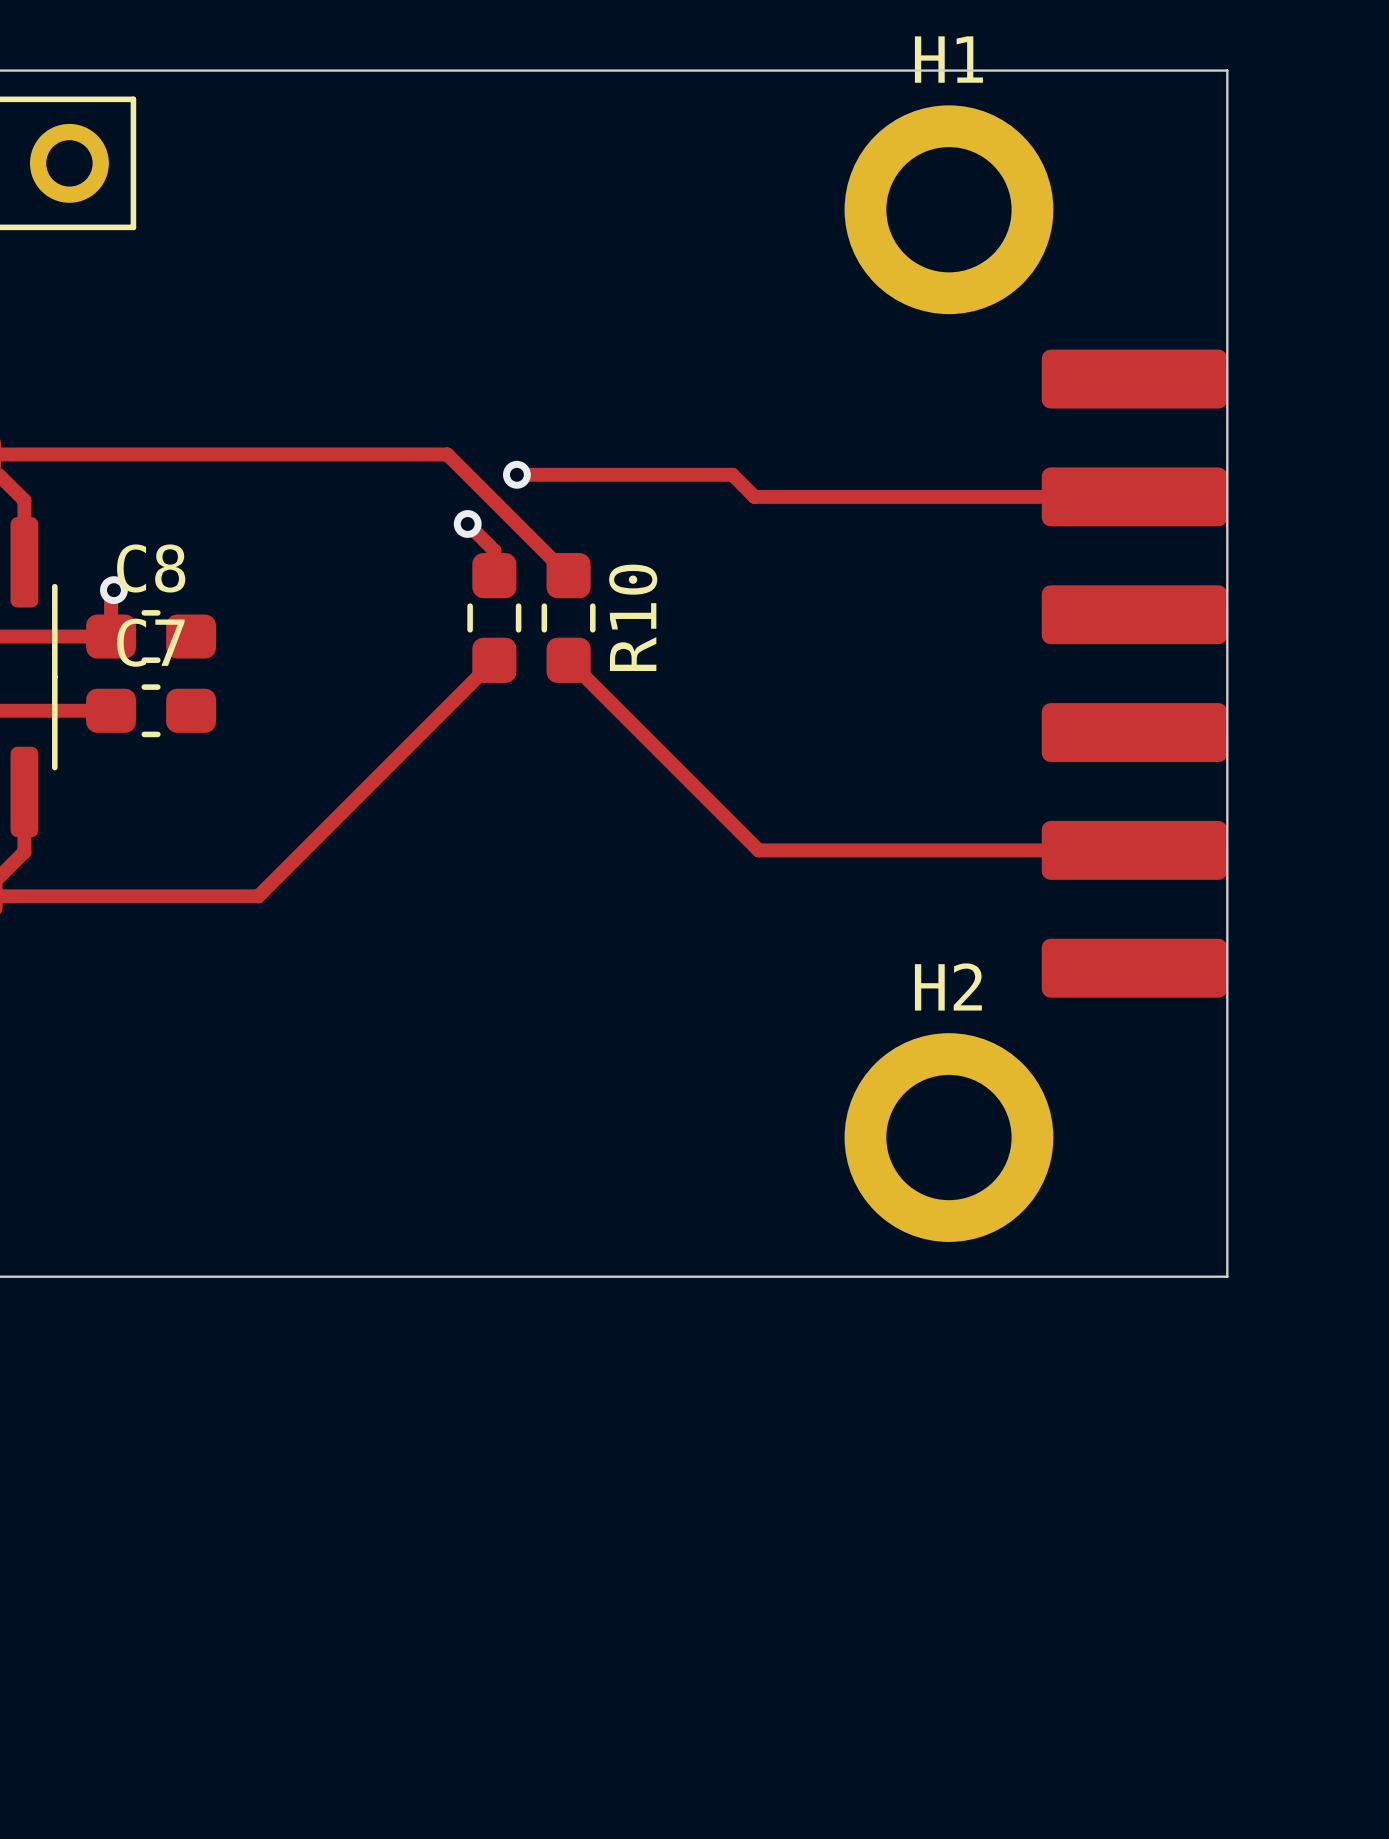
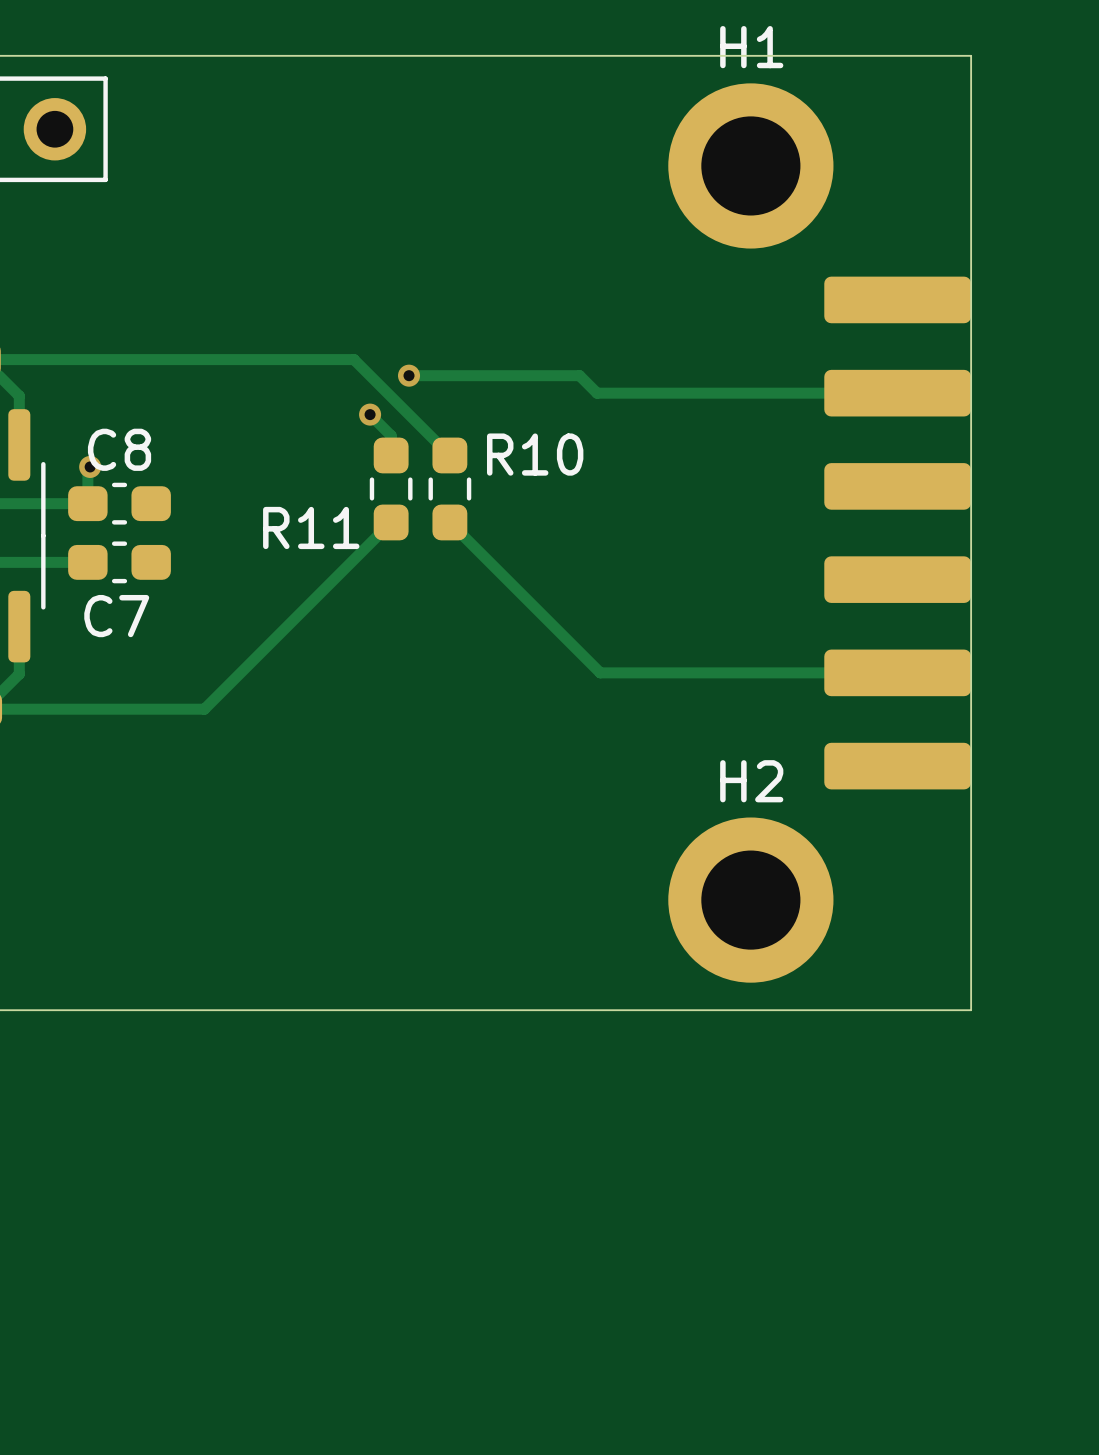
R10 name rotation: 0° (633, 617) -> 90° clockwise (535, 454)
C7 name position: C7 (150, 642) -> C7 (116, 616)
R11 name: none -> R11 (311, 527)

